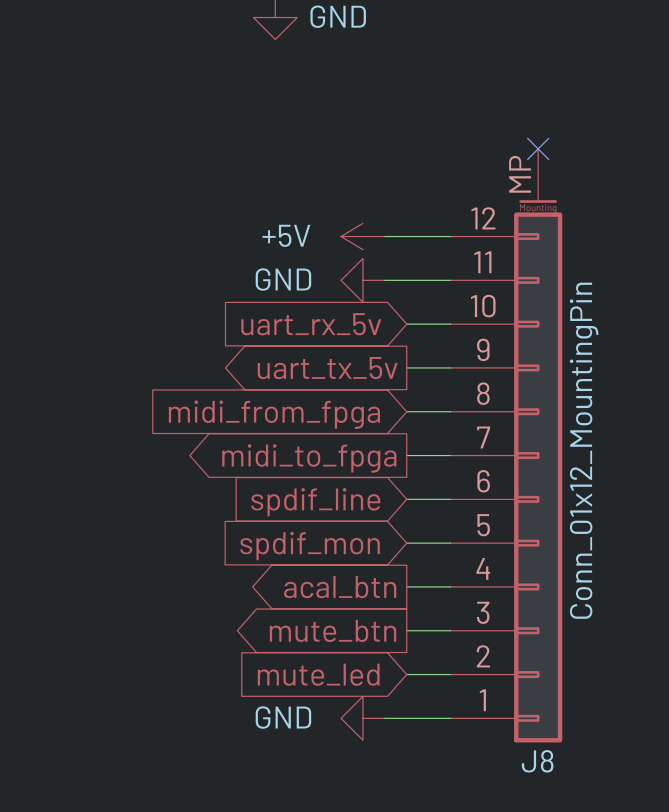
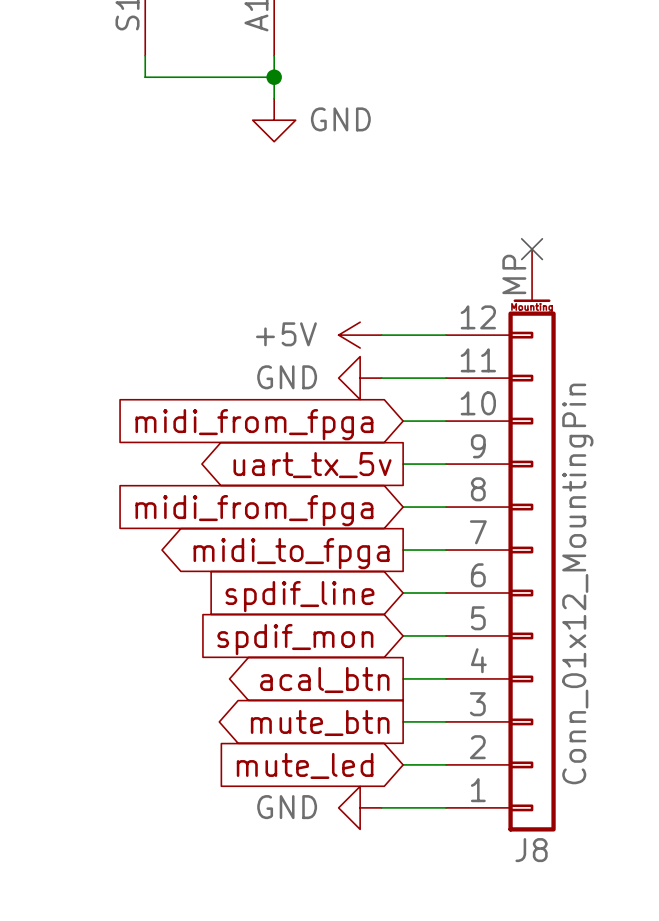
global label: uart_rx_5v (311, 324) -> midi_from_fpga (254, 424)

